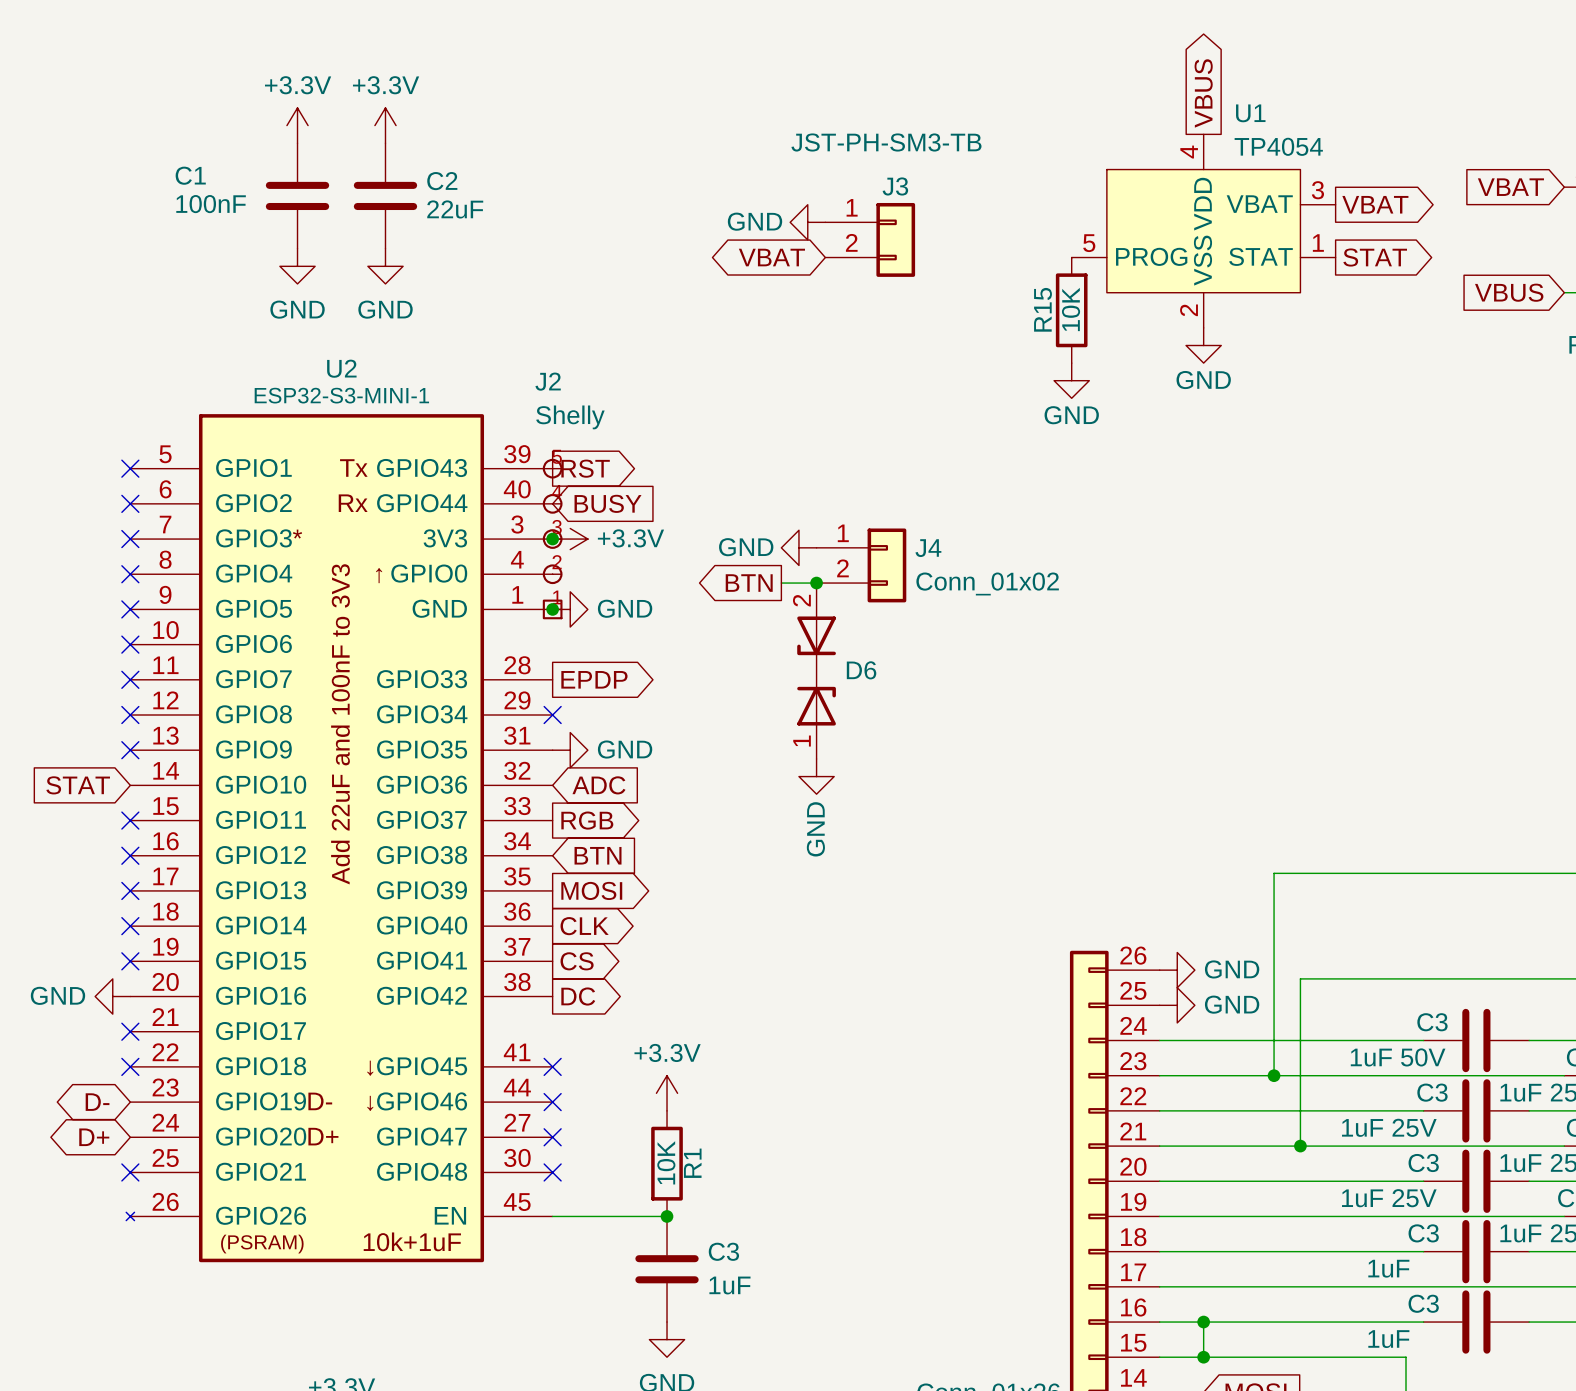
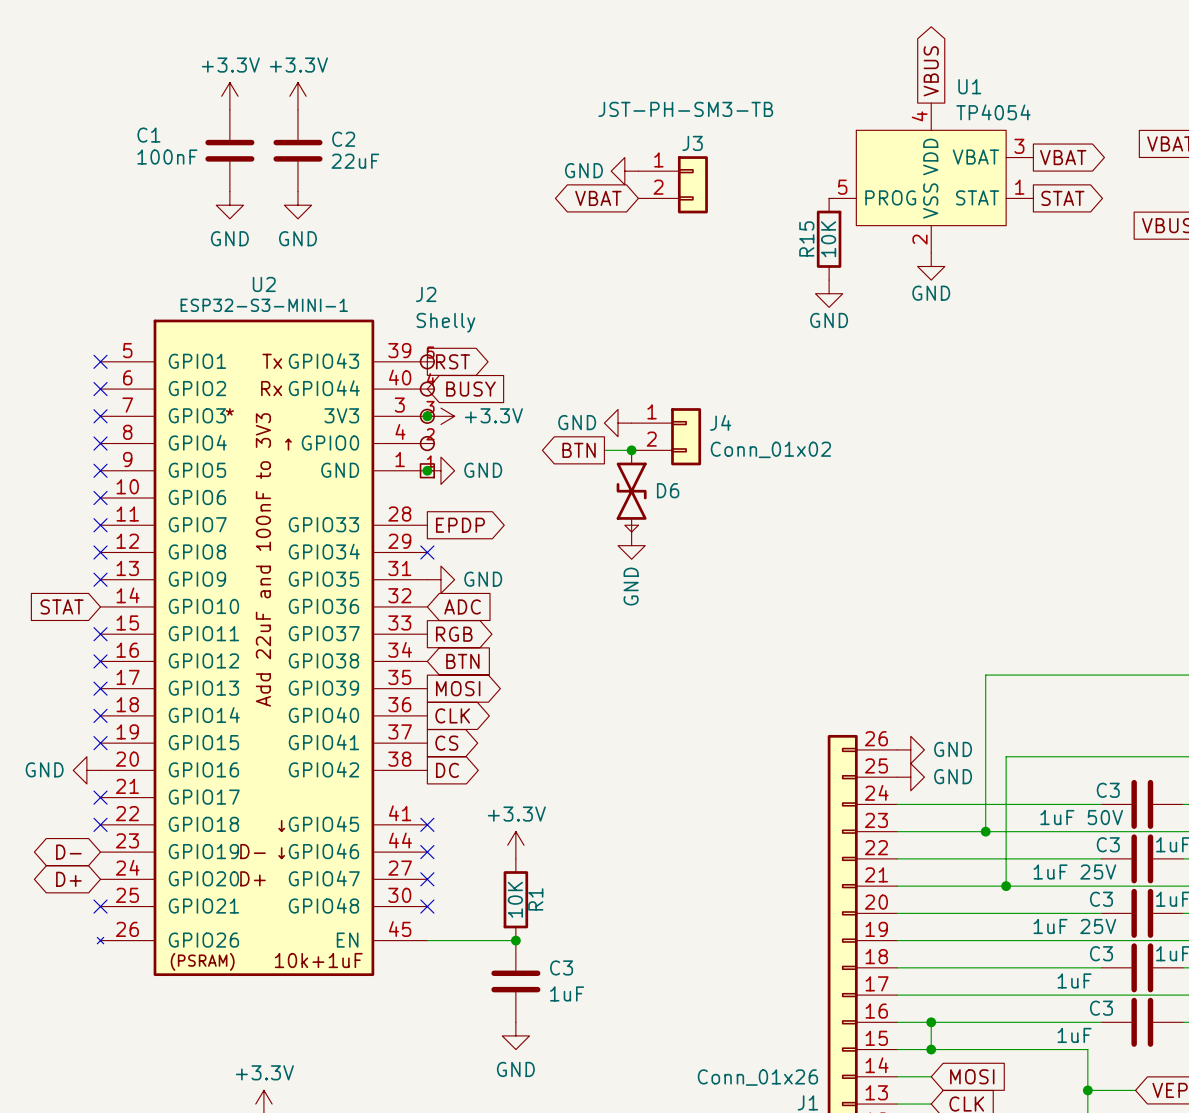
D6 symbol: [797, 583, 836, 759] -> [616, 450, 647, 533]
power symbol position: GND (816, 776) -> GND (631, 545)

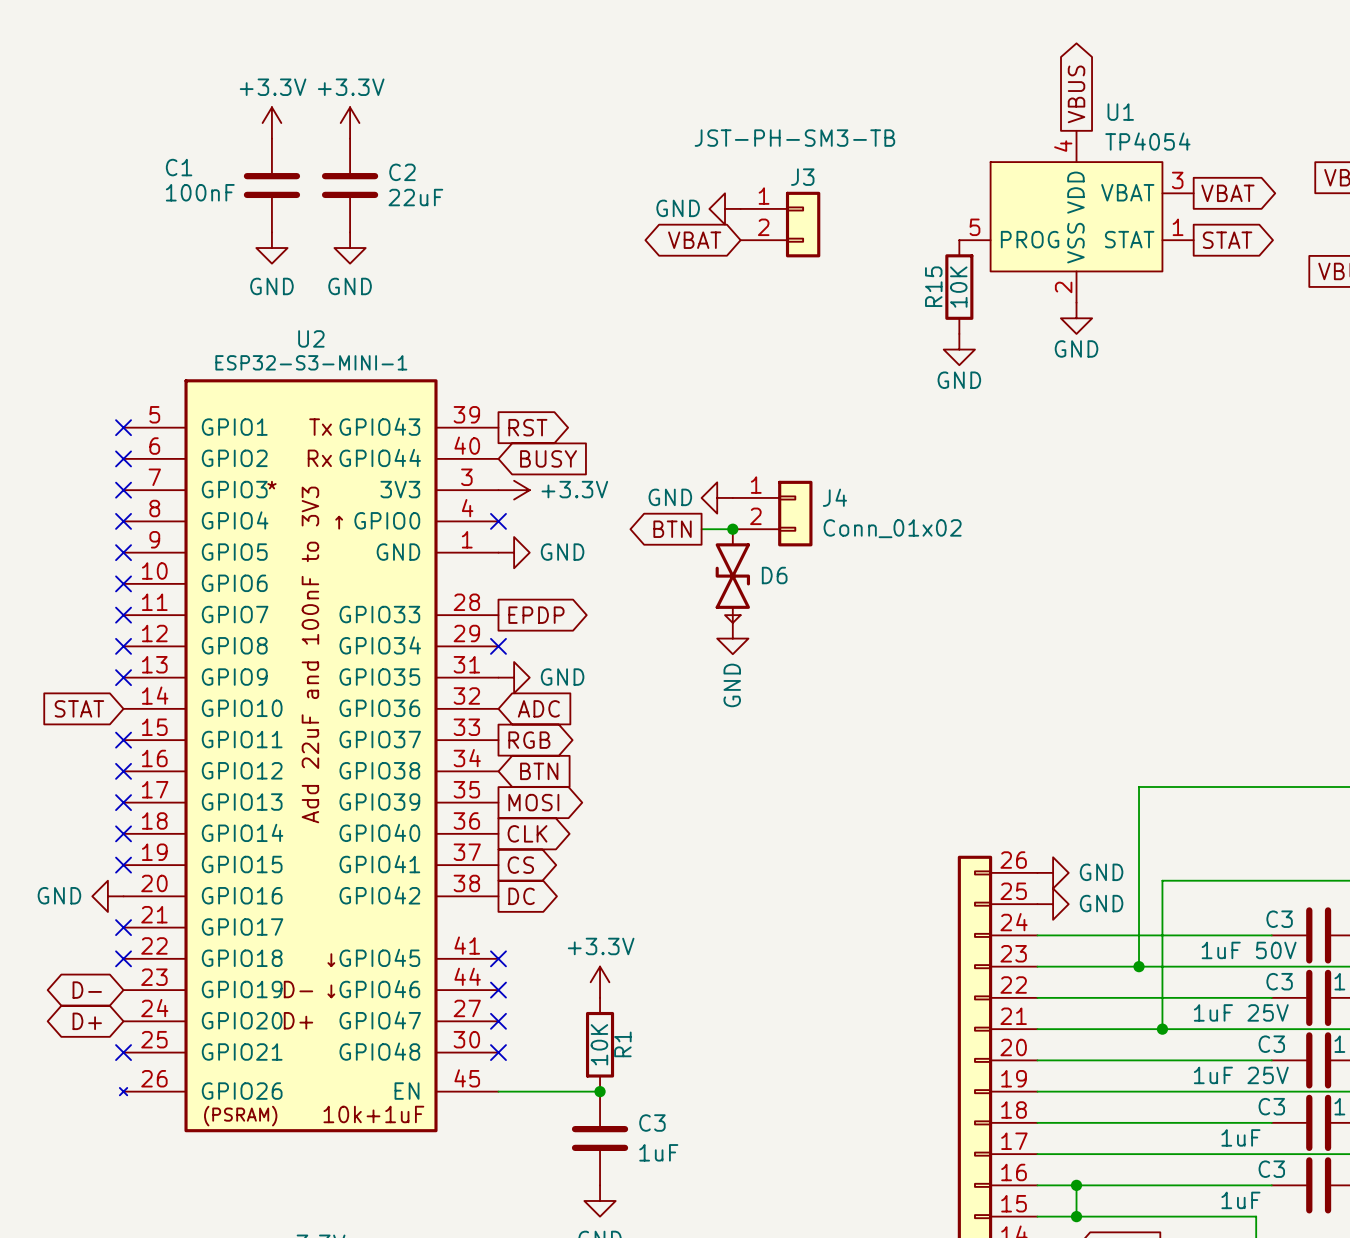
junction: (427, 416) -> none
J2: Shelly (427, 416) -> none
no-connect mark: none -> (498, 521)
junction: (427, 470) -> none

